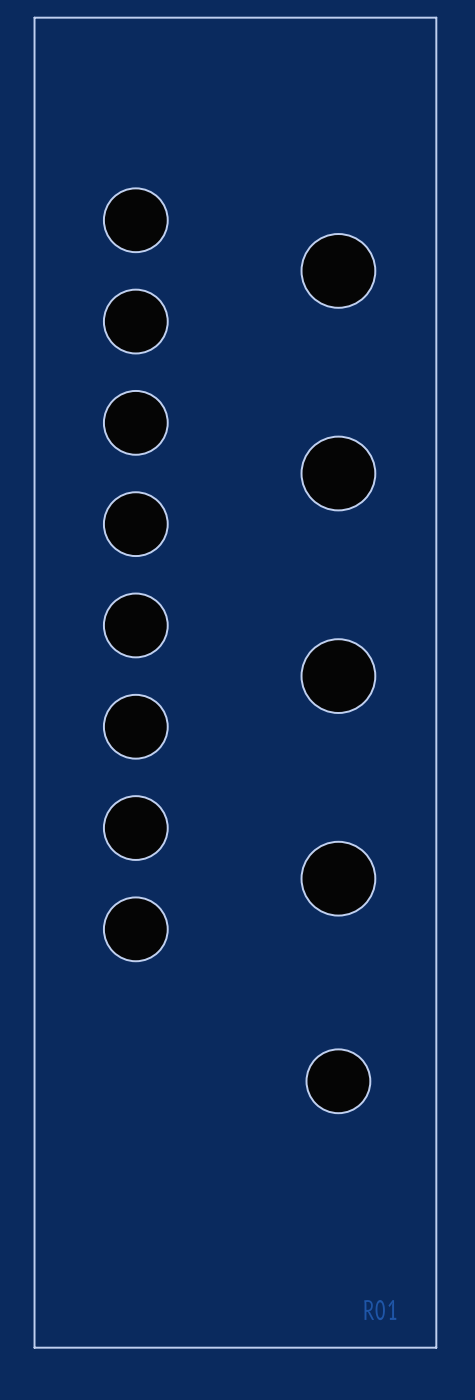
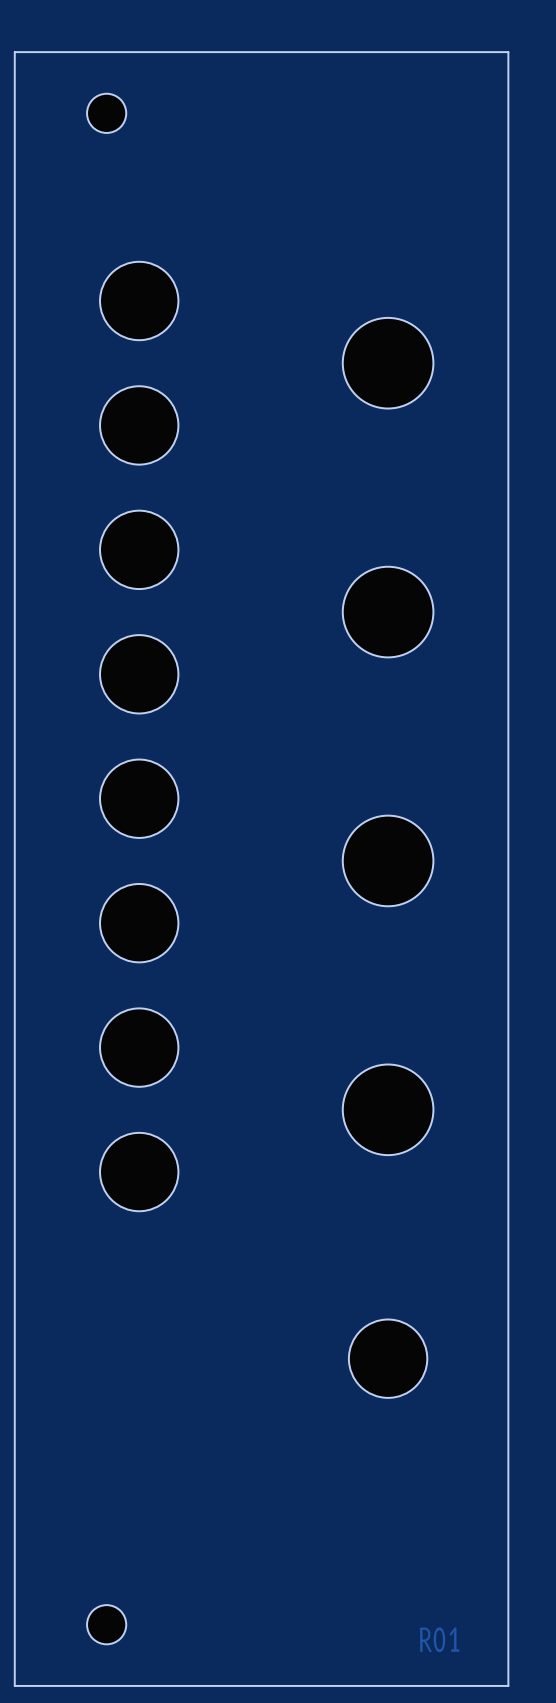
part: none -> (106, 113)
part: none -> (106, 1624)

